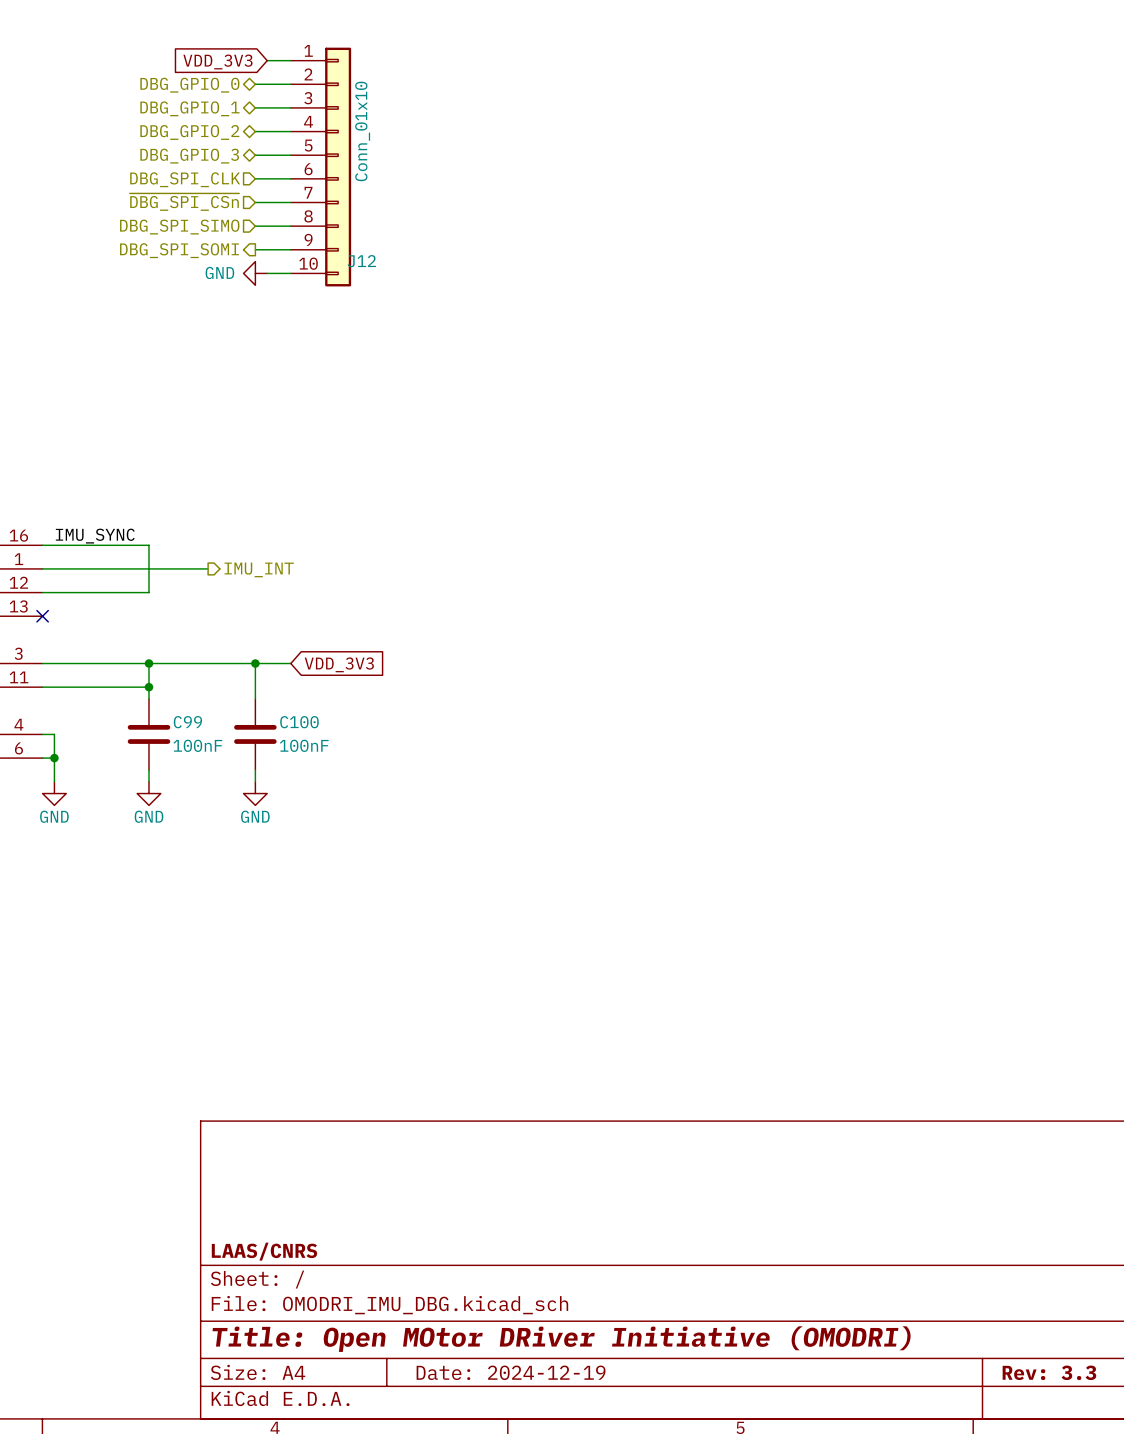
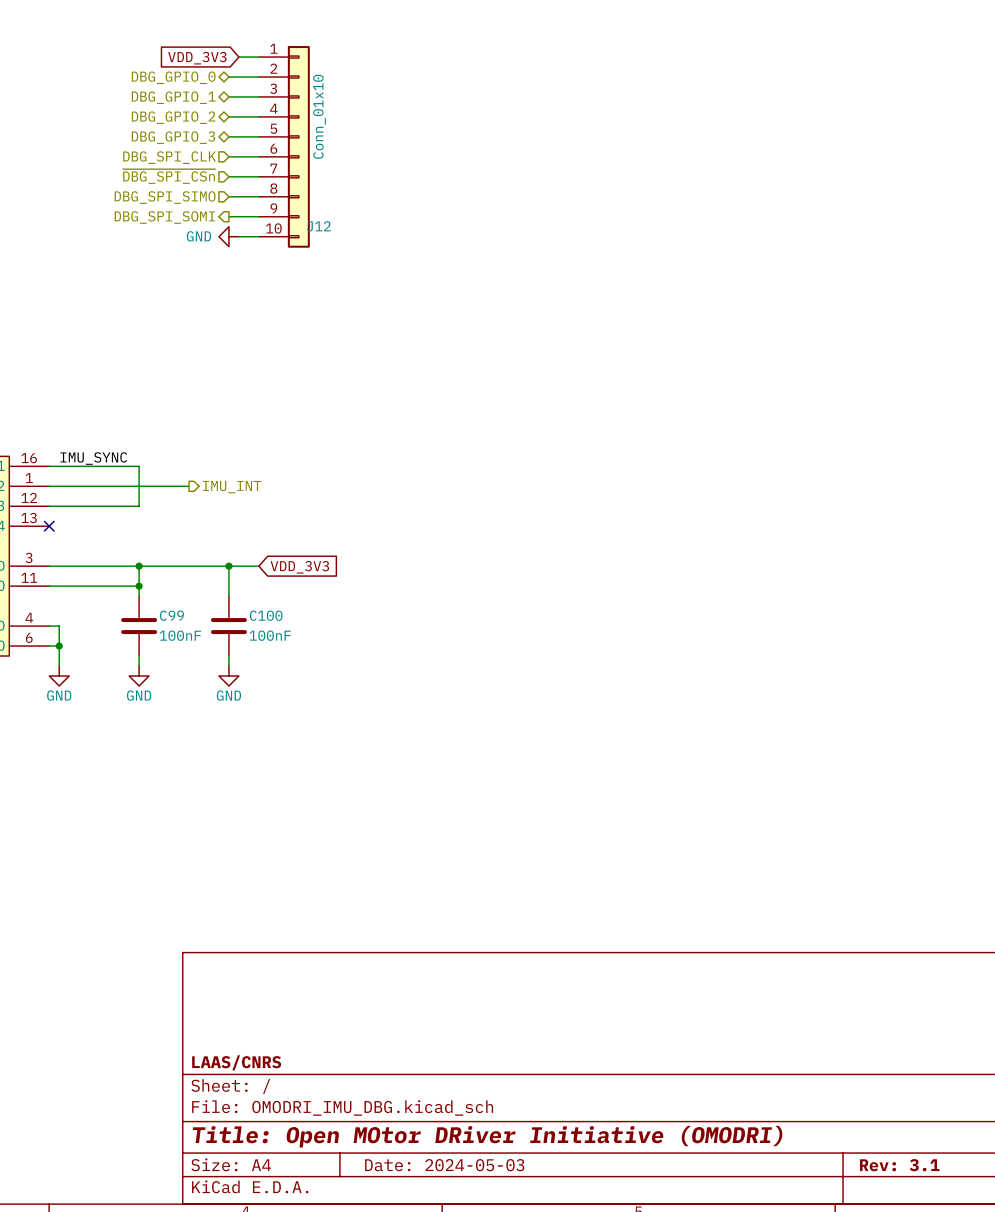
title block: Date: 2024-12-19 (511, 1372) -> Date: 2024-05-03 (444, 1165)
title block: Rev: 3.3 (1049, 1372) -> Rev: 3.1 (899, 1165)

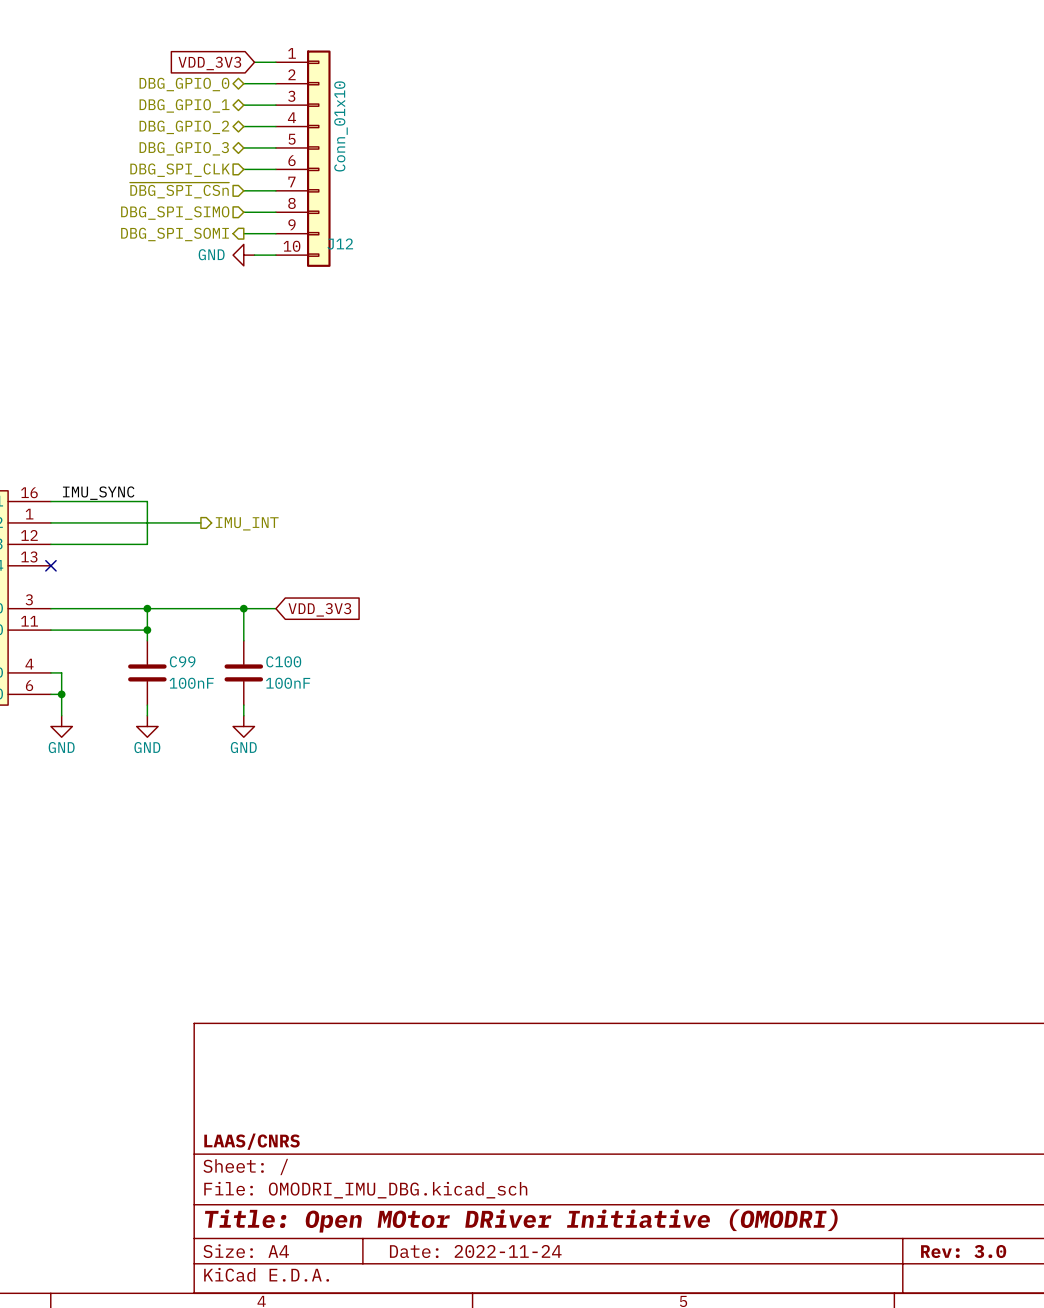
title block: Date: 2024-05-03 (444, 1165) -> Date: 2022-11-24 (475, 1251)
title block: Rev: 3.1 (899, 1165) -> Rev: 3.0 (963, 1251)

